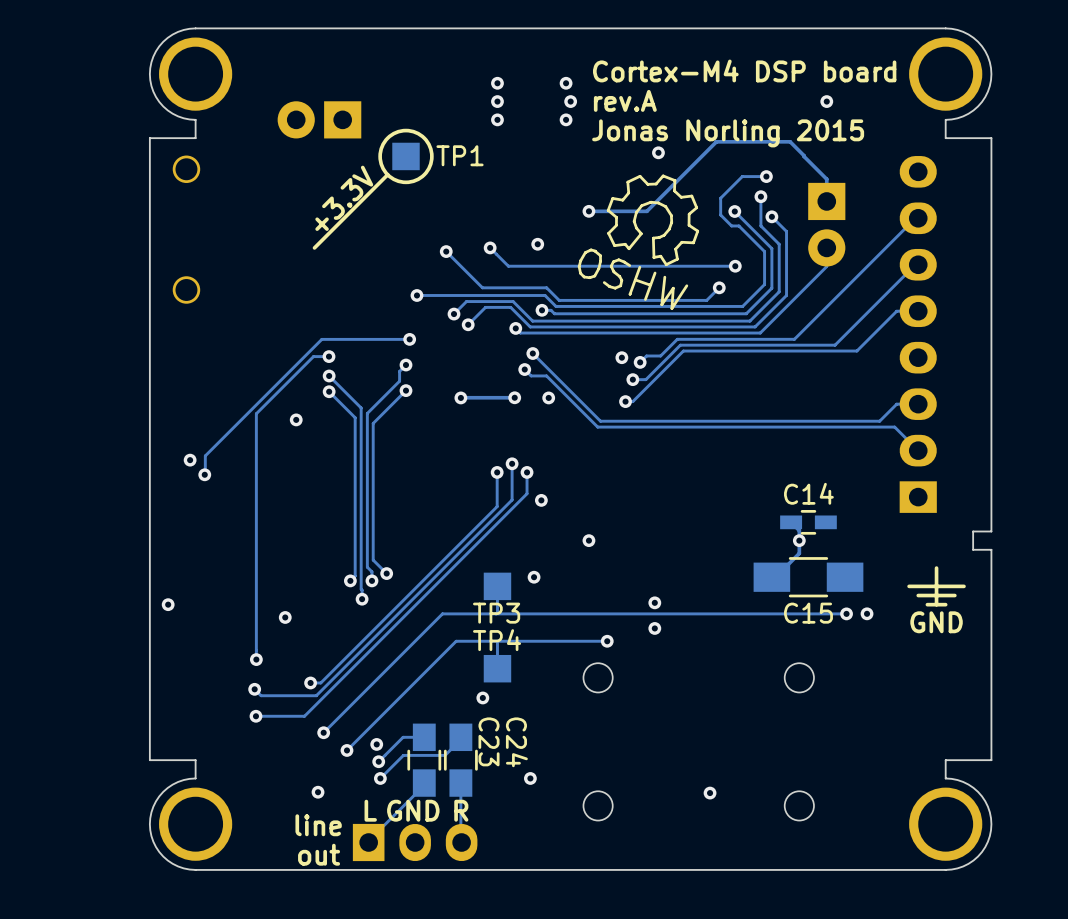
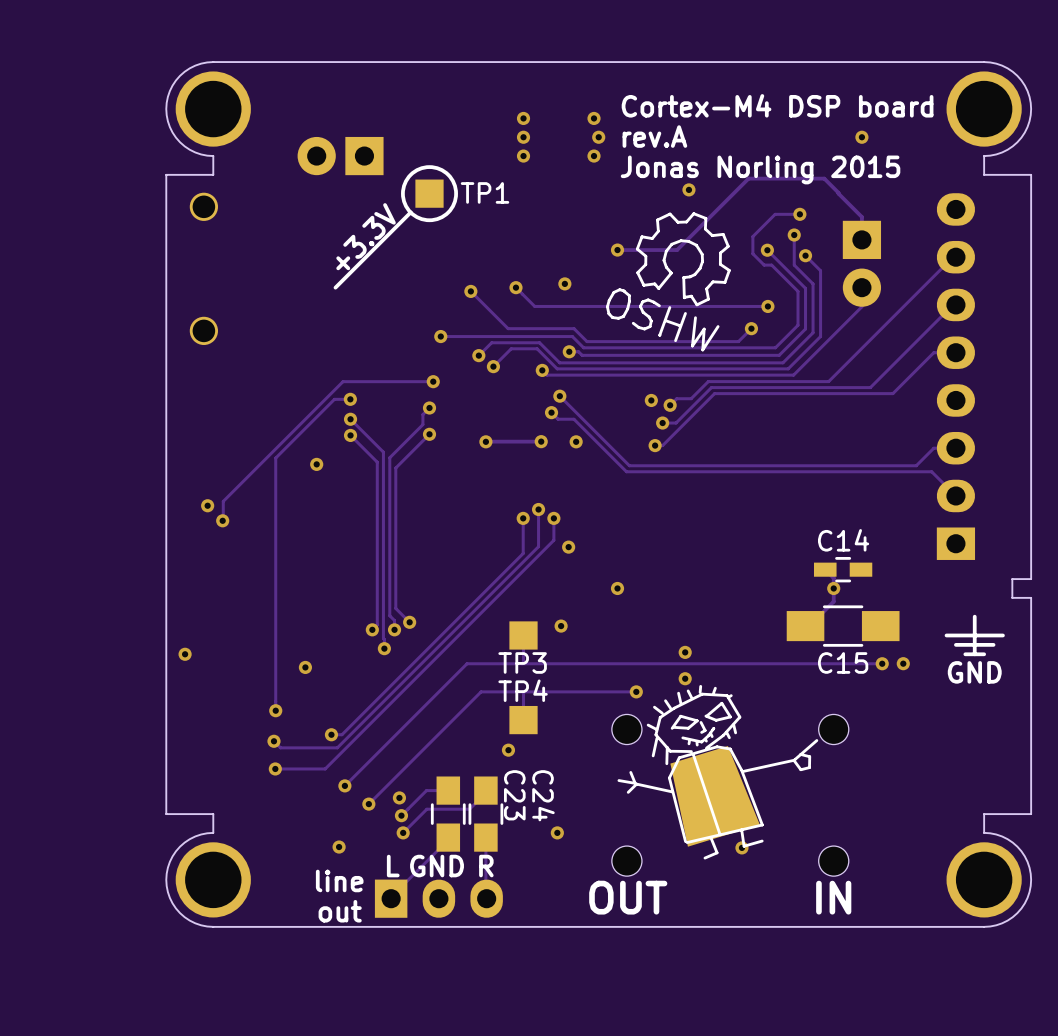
part: none -> (717, 772)
text: none -> OUT (628, 897)
text: none -> IN (833, 897)

